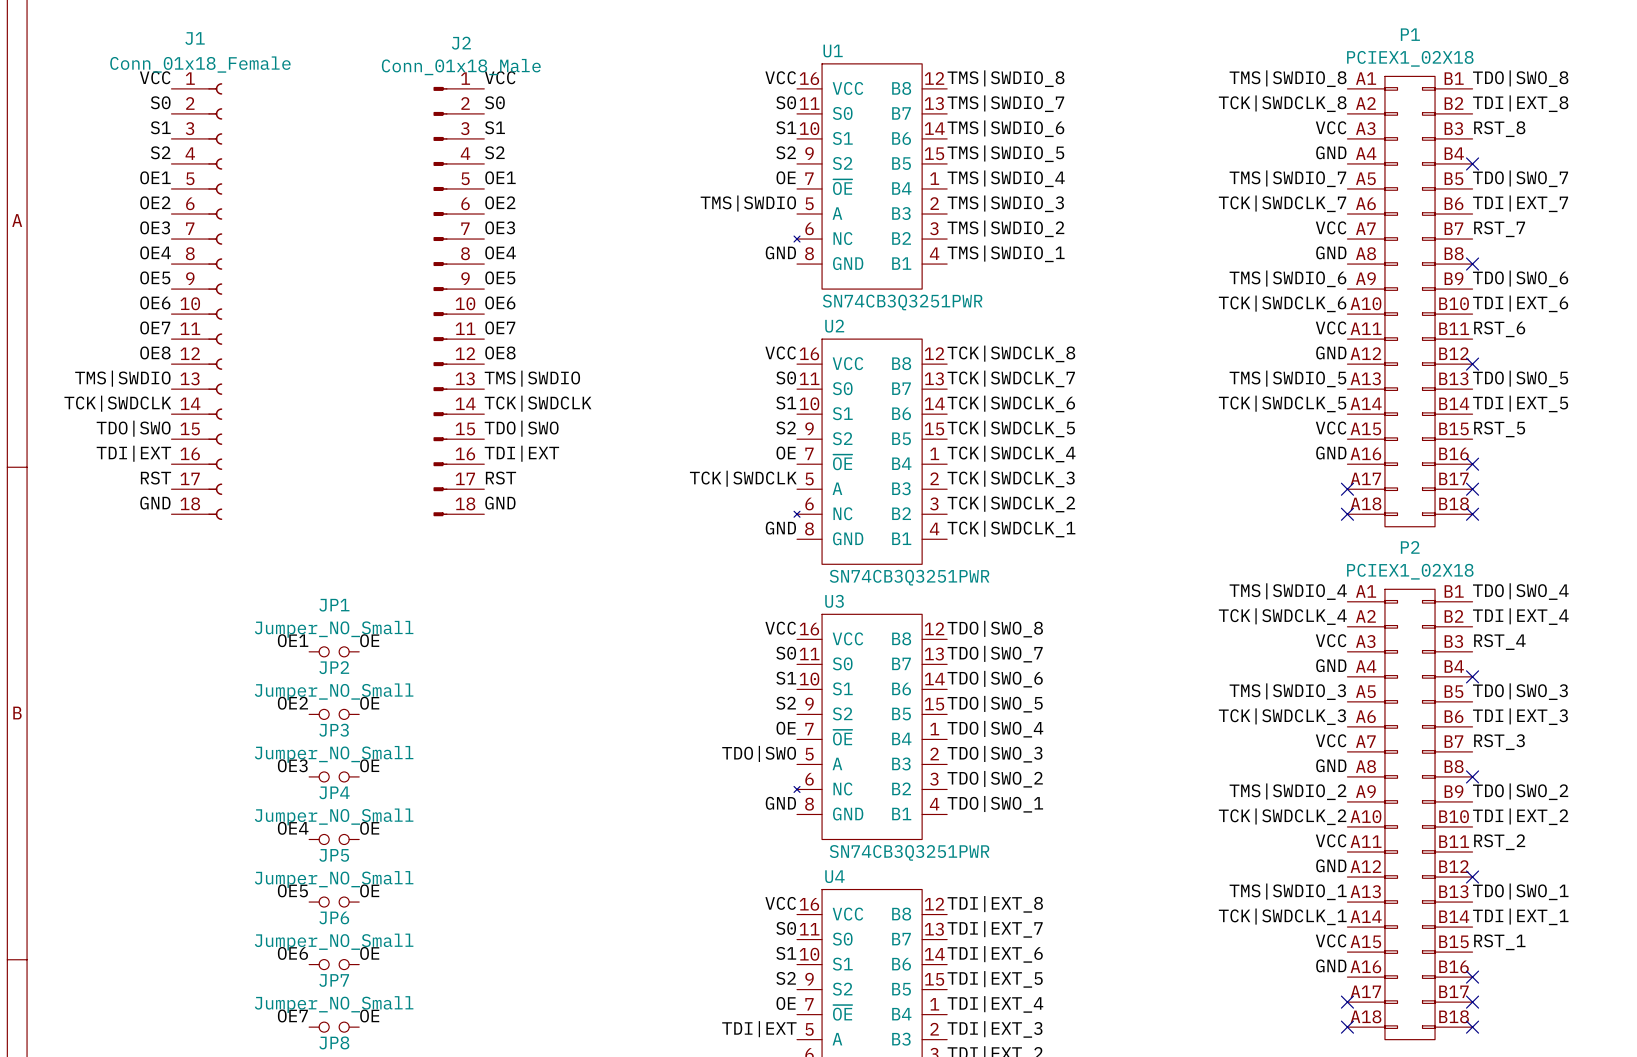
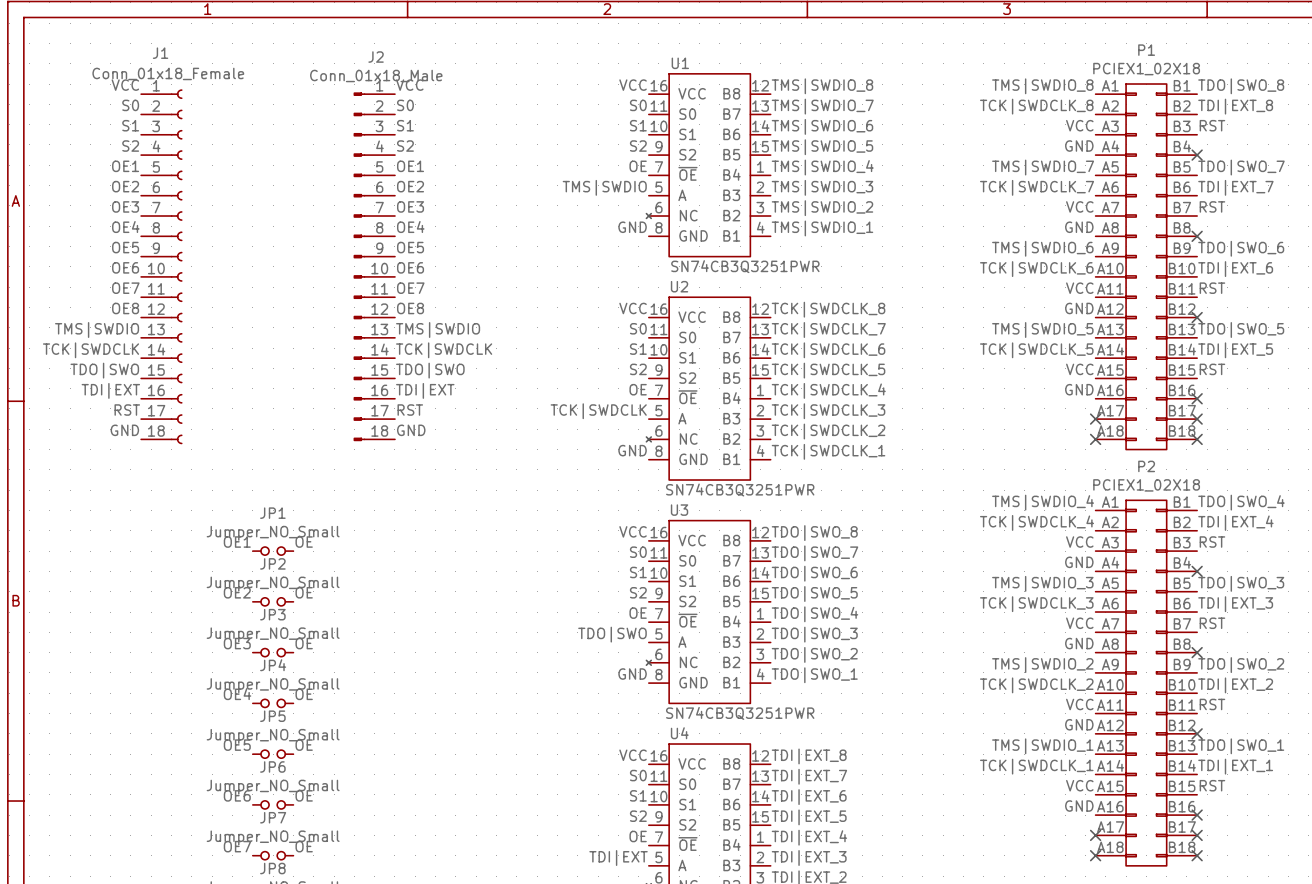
label: RST_8 (1499, 129) -> RST (1212, 125)
label: RST_7 (1499, 229) -> RST (1212, 206)
label: RST_6 (1499, 329) -> RST (1212, 288)
label: RST_5 (1499, 429) -> RST (1212, 369)
label: RST_4 (1499, 642) -> RST (1212, 542)
label: RST_3 (1499, 742) -> RST (1212, 623)
label: RST_2 (1499, 842) -> RST (1212, 704)
label: RST_1 (1499, 942) -> RST (1212, 785)

